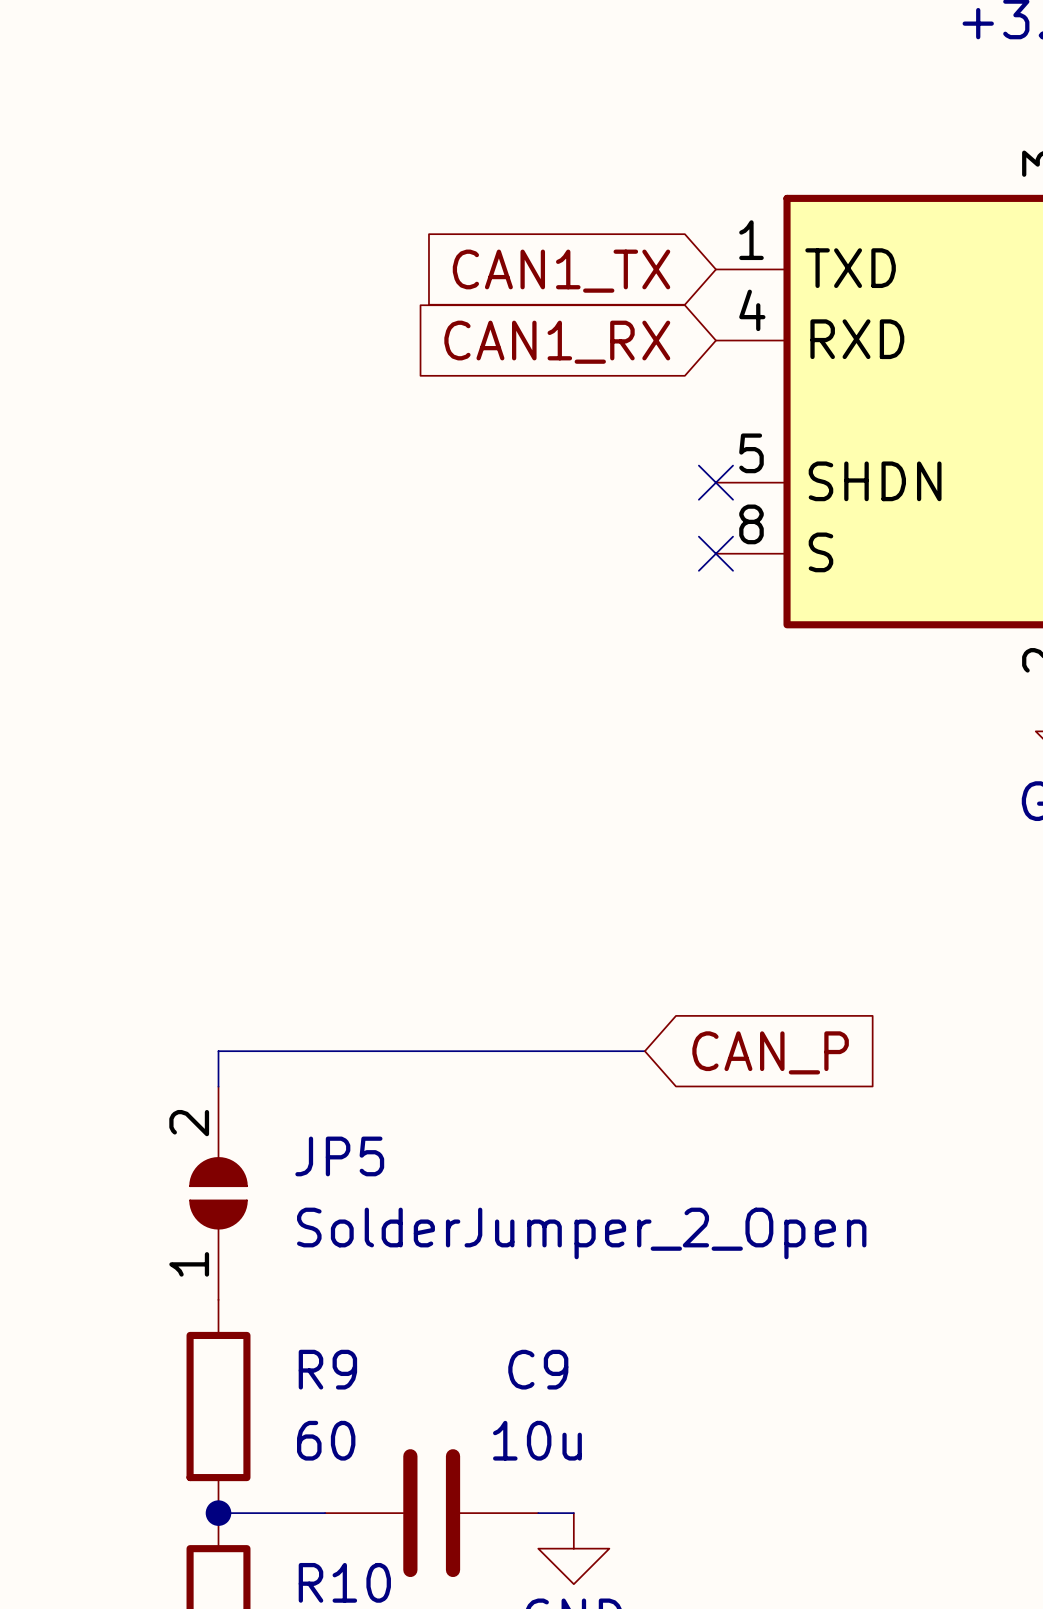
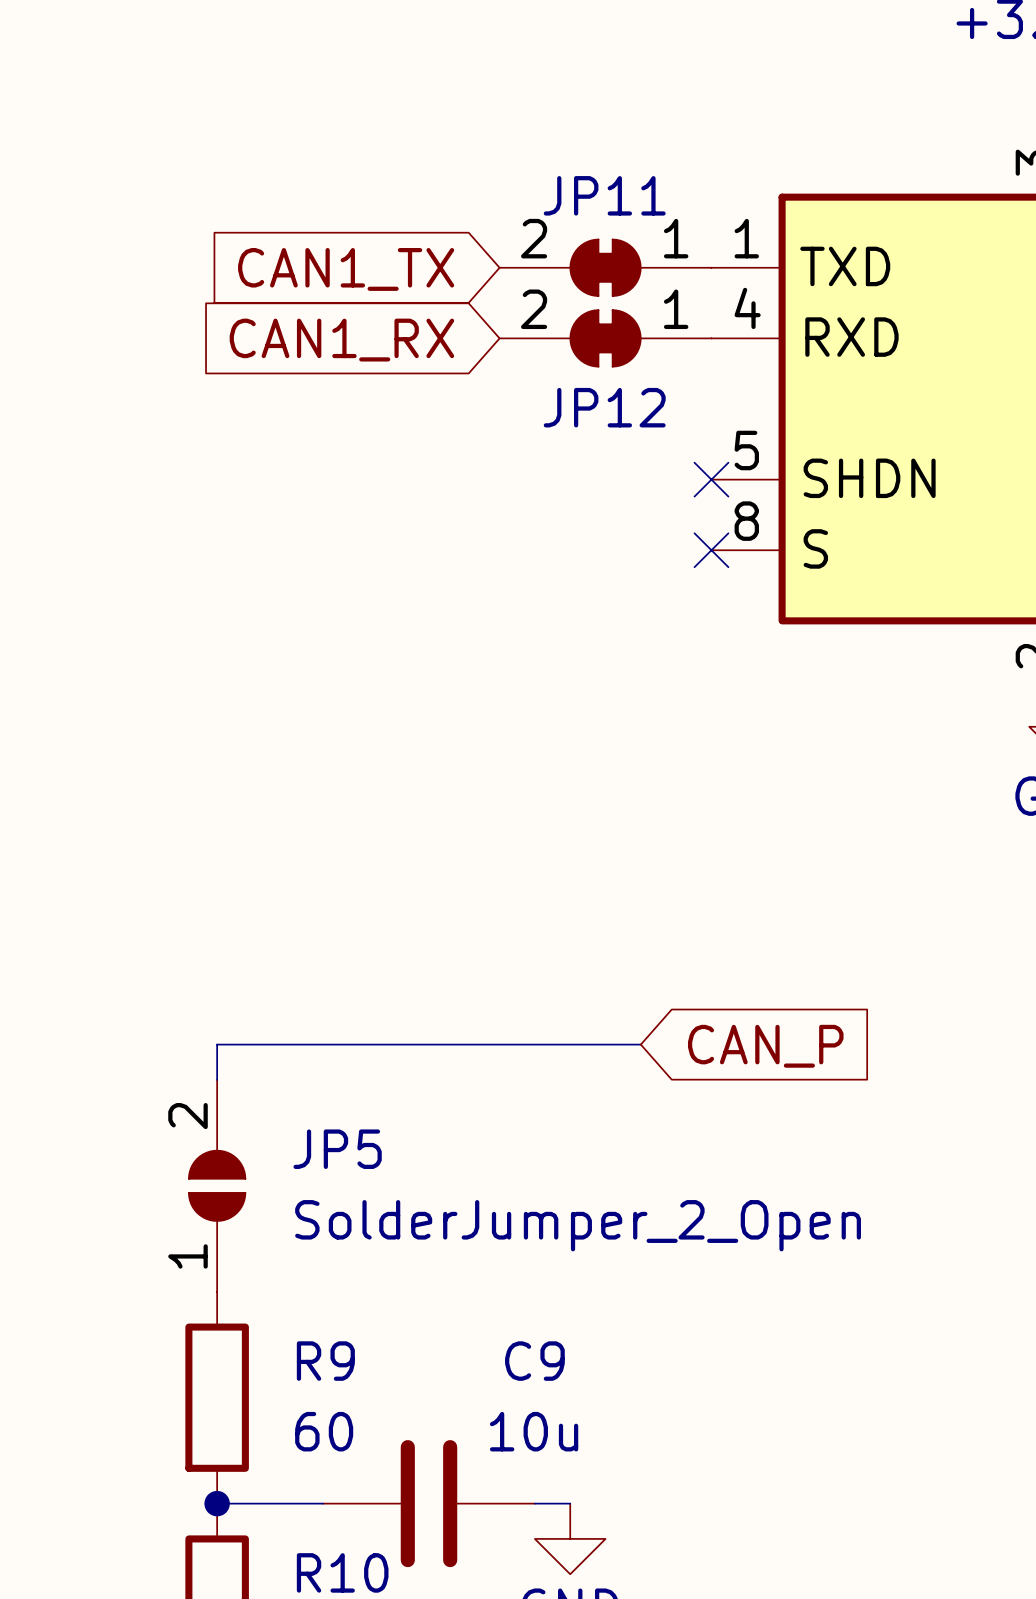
JP11: none -> (605, 267)
global label position: CAN1_TX (561, 271) -> CAN1_TX (346, 269)
JP12: none -> (605, 338)
global label position: CAN1_RX (557, 342) -> CAN1_RX (341, 340)

